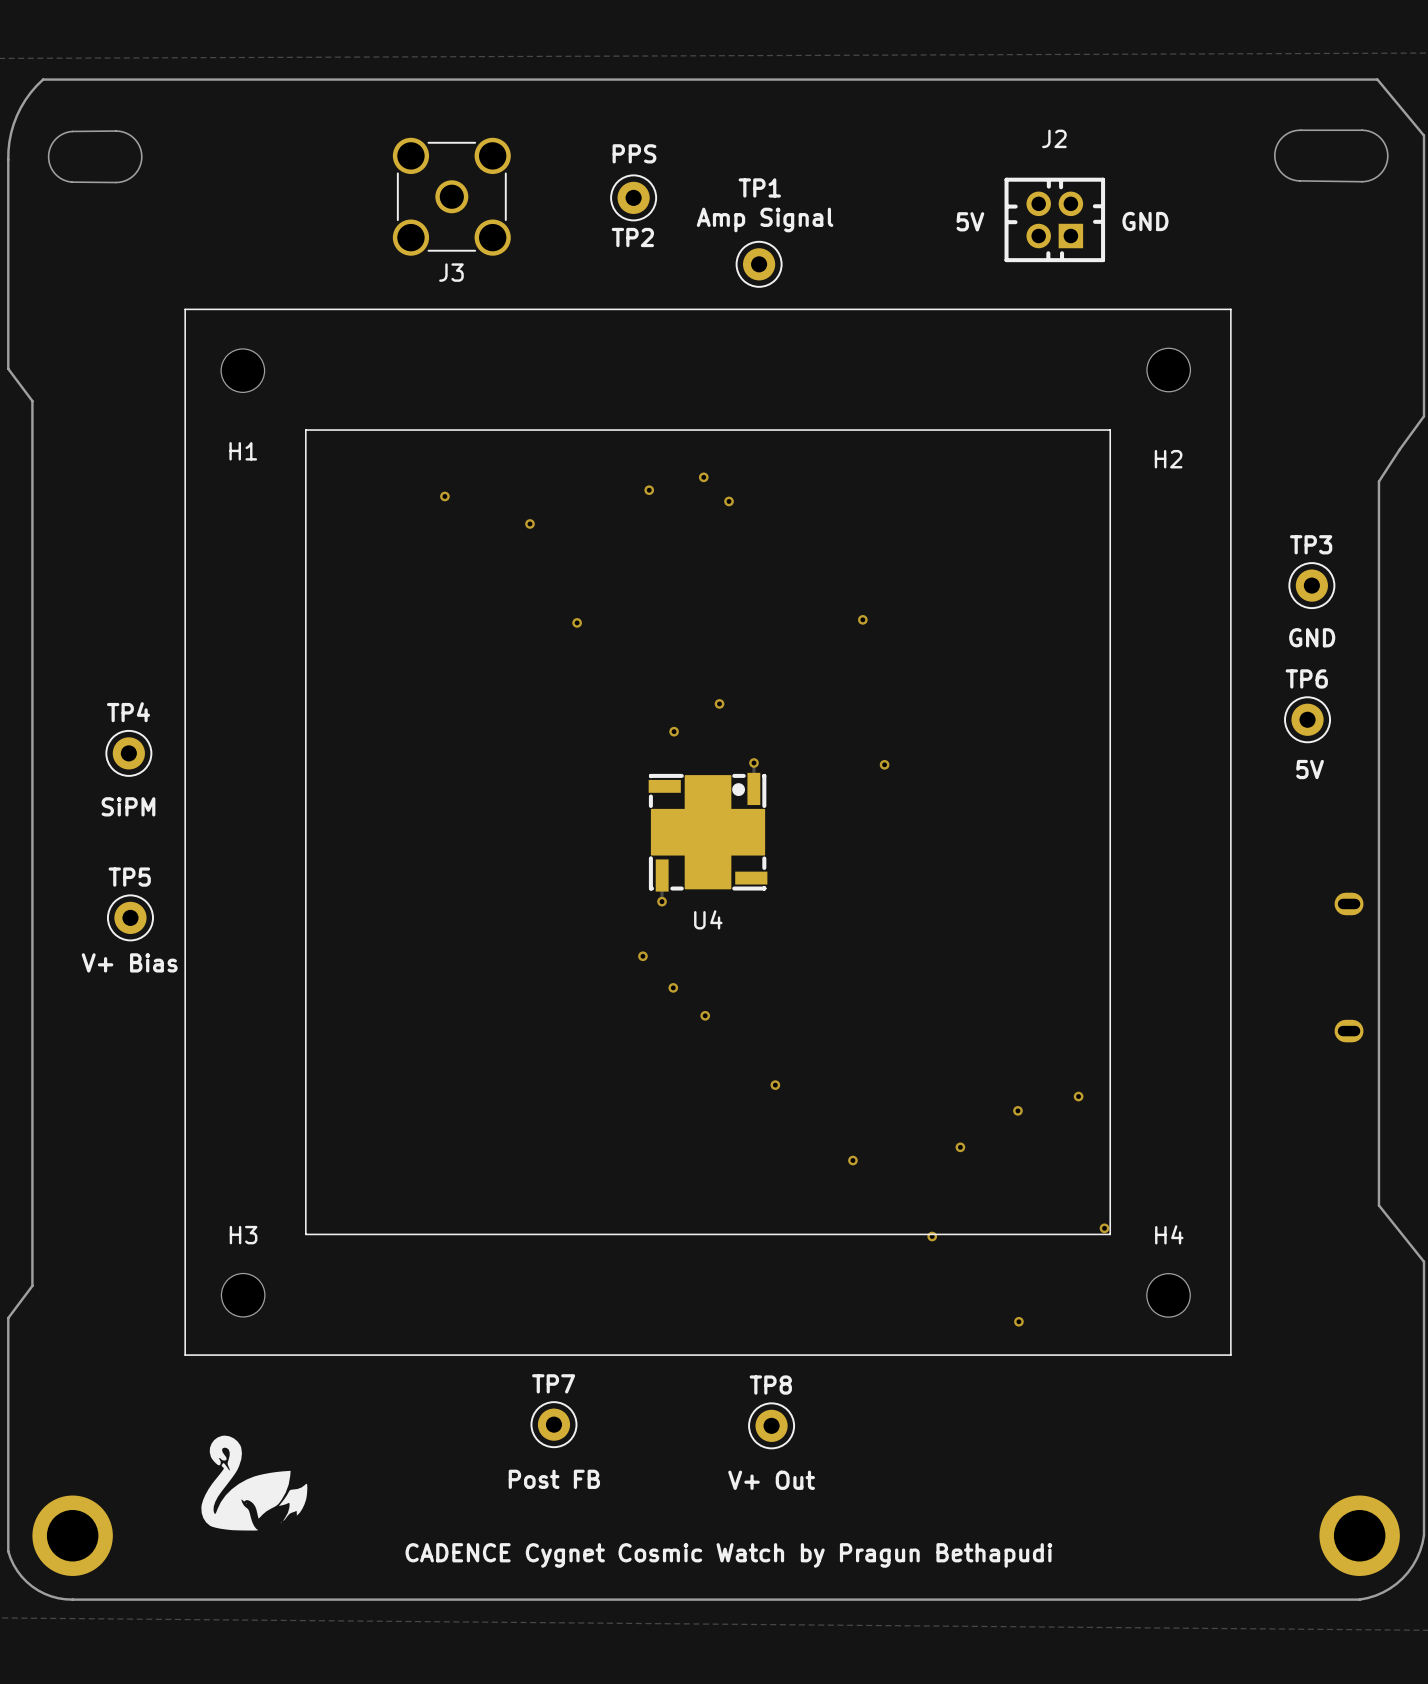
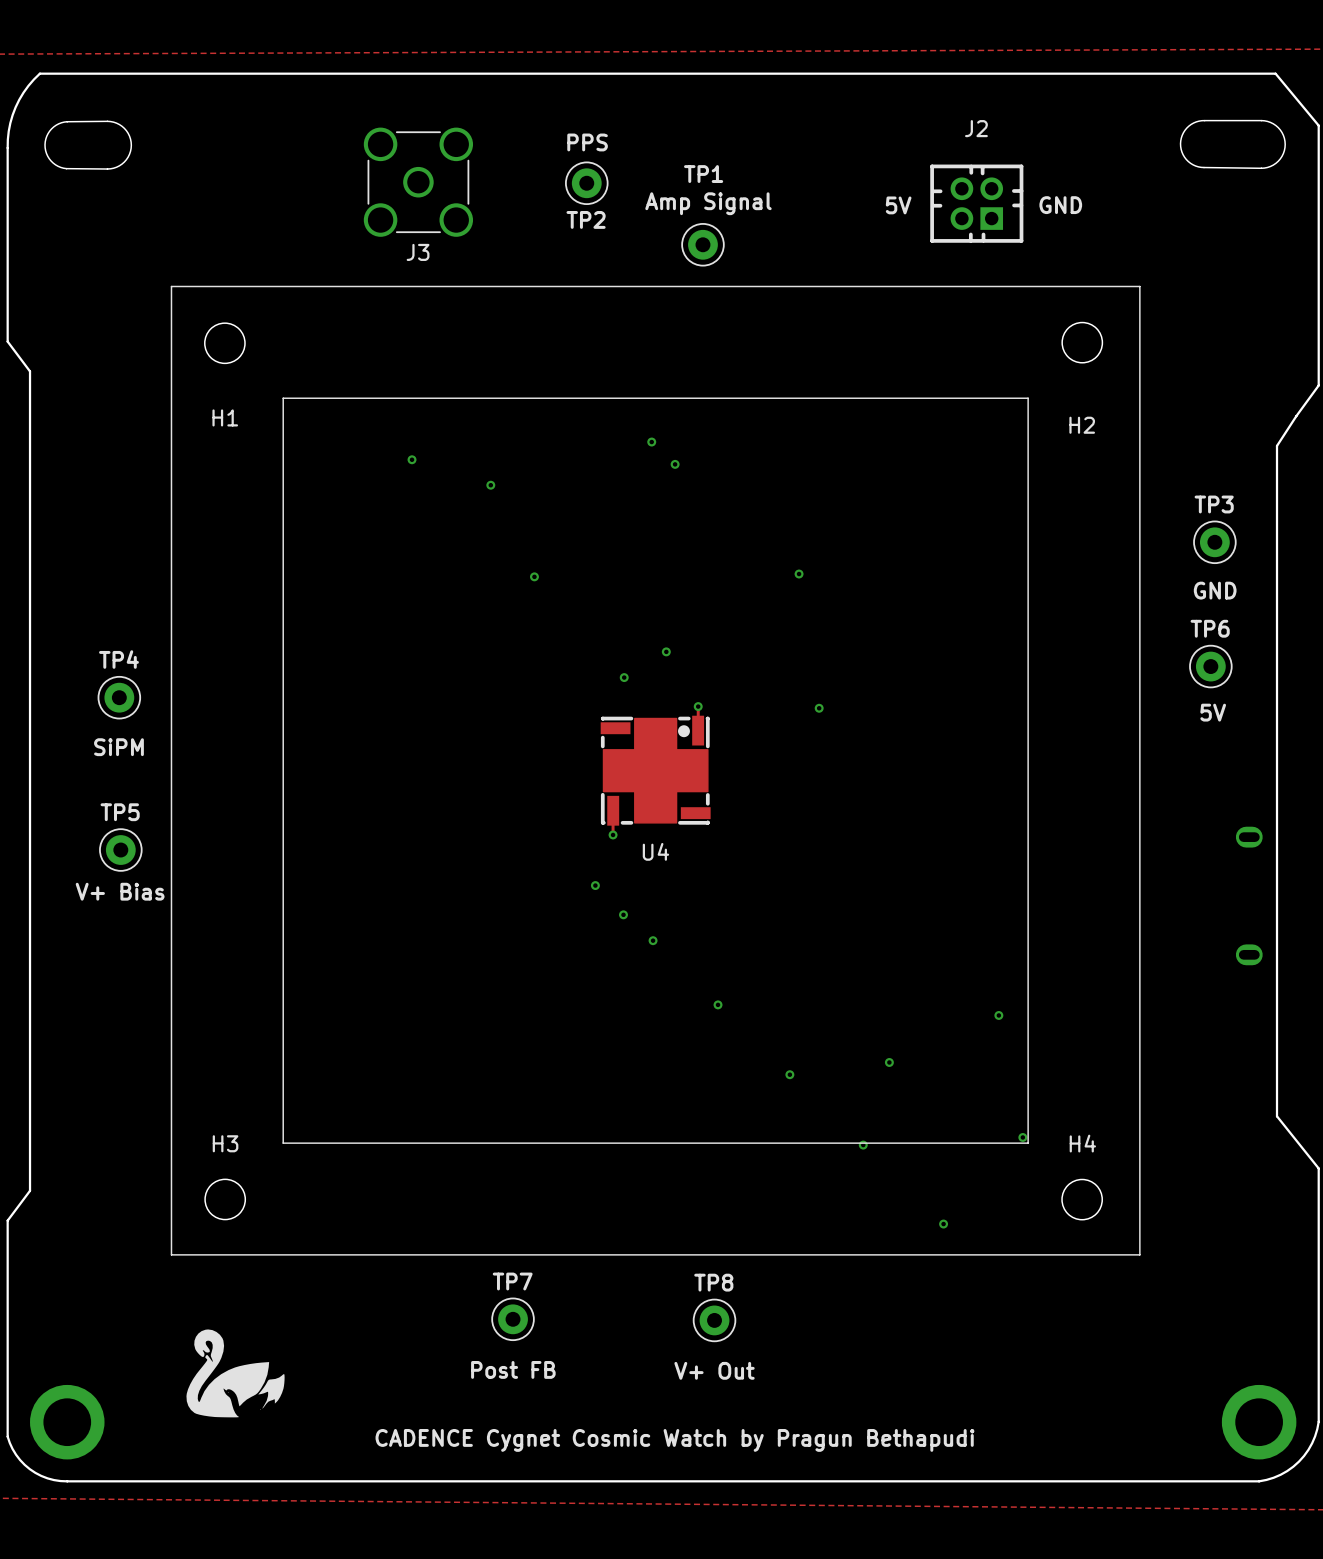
via: (649, 490) -> none
via: (1017, 1110) -> none

